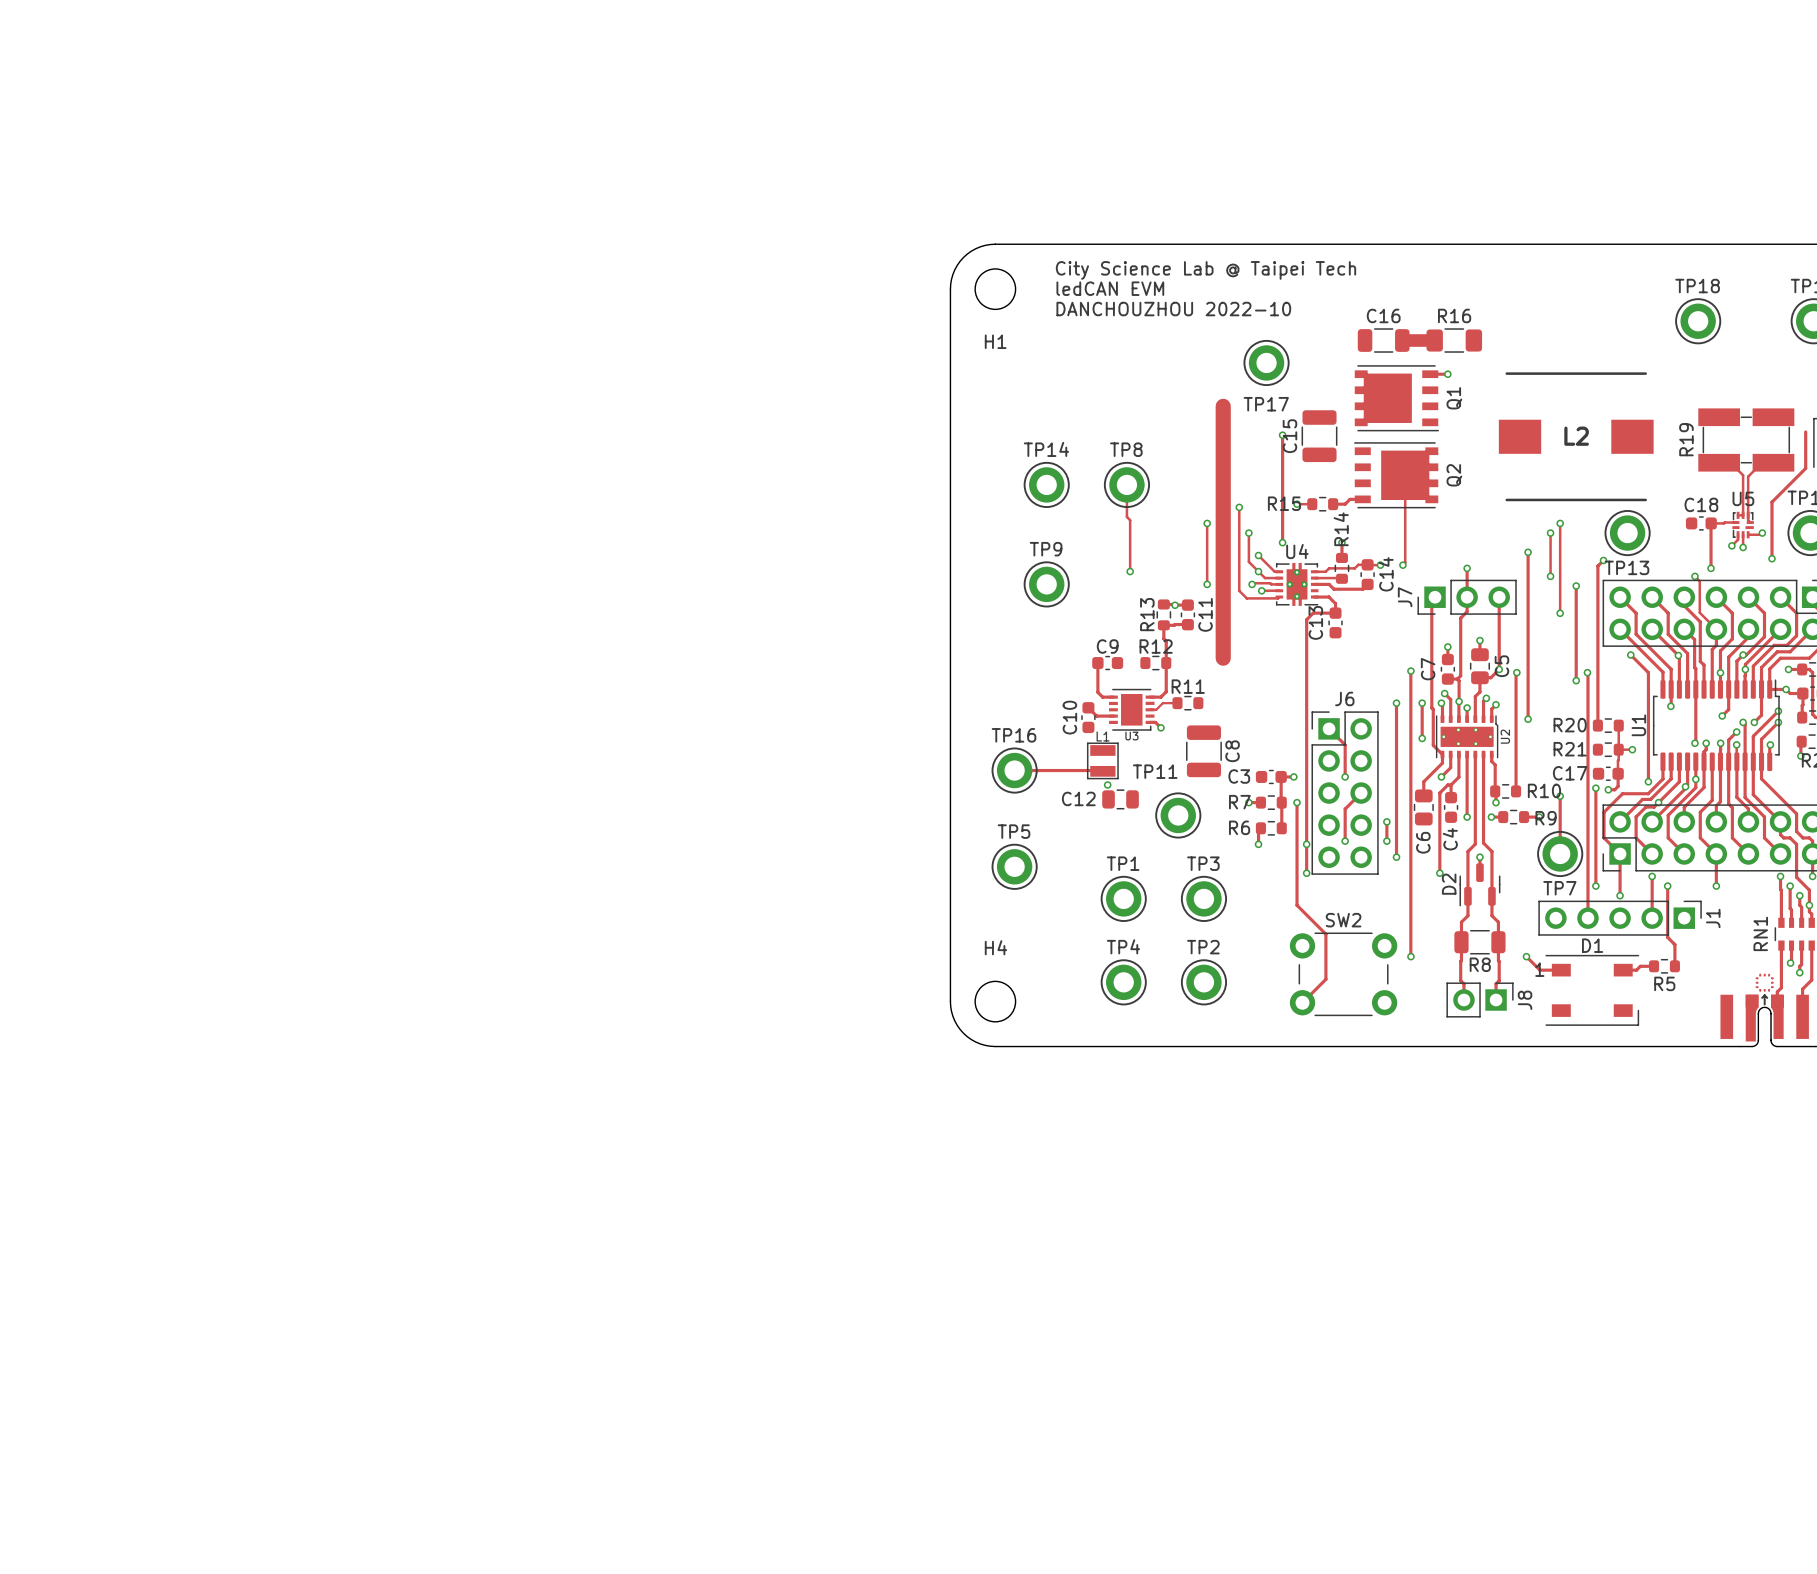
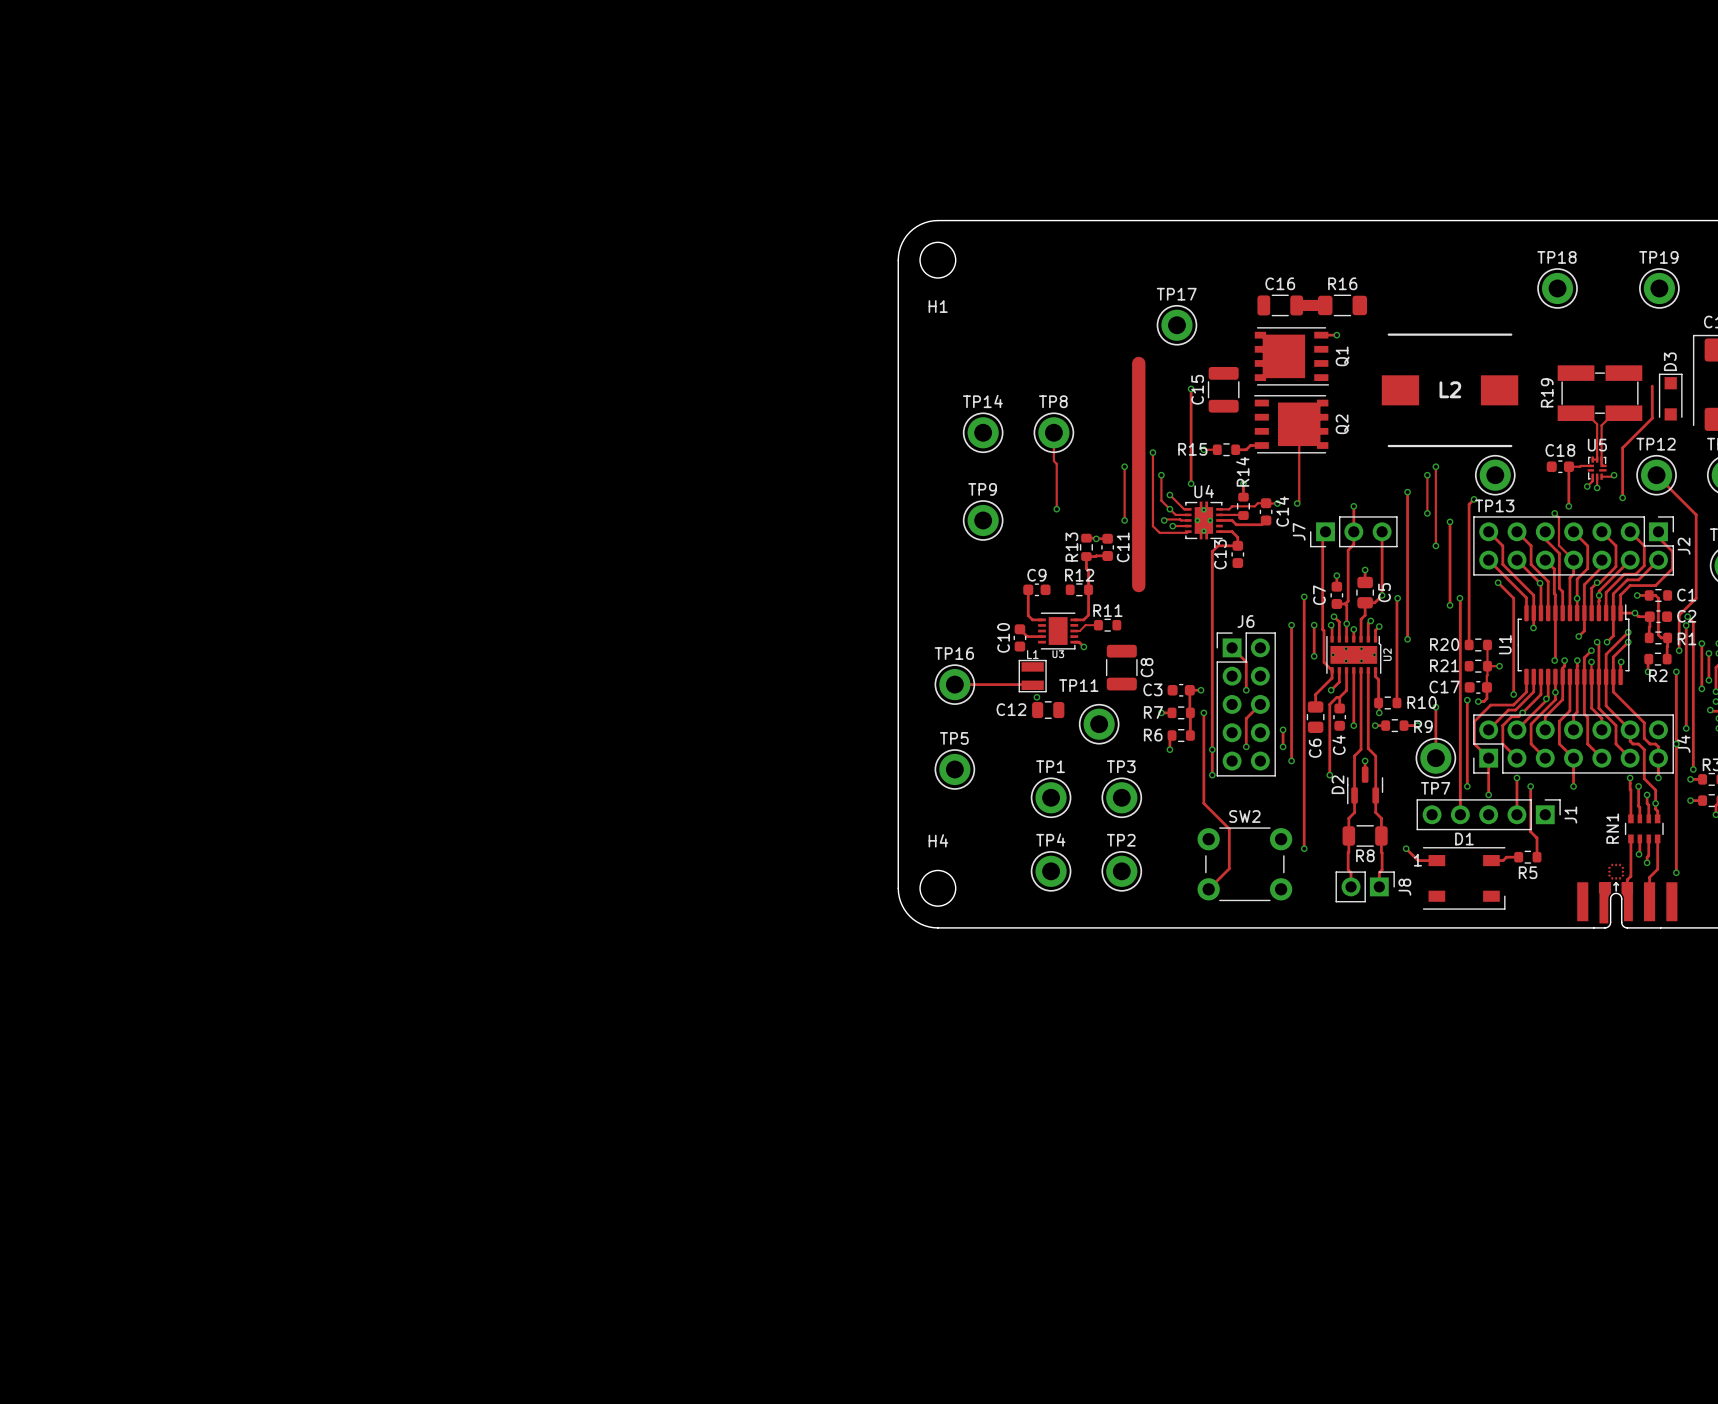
text: City Science Lab @ Taipei Tech (1205, 270) -> none
text: ledCAN EVM (1110, 288) -> none
text: DANCHOUZHOU 2022-10 (1173, 309) -> none
TP17 name position: TP17 (1266, 404) -> TP17 (1176, 294)

